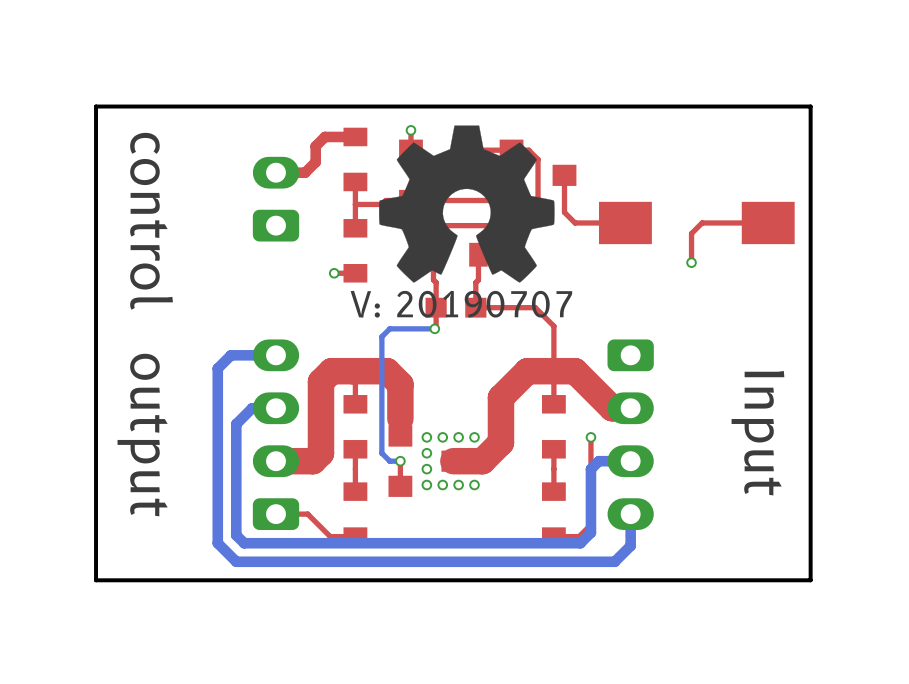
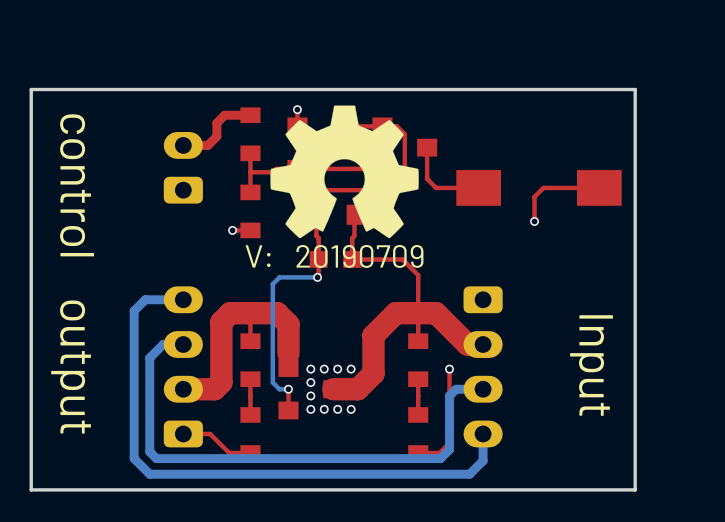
drawing shape: [350, 290, 573, 318] -> [245, 244, 424, 268]

